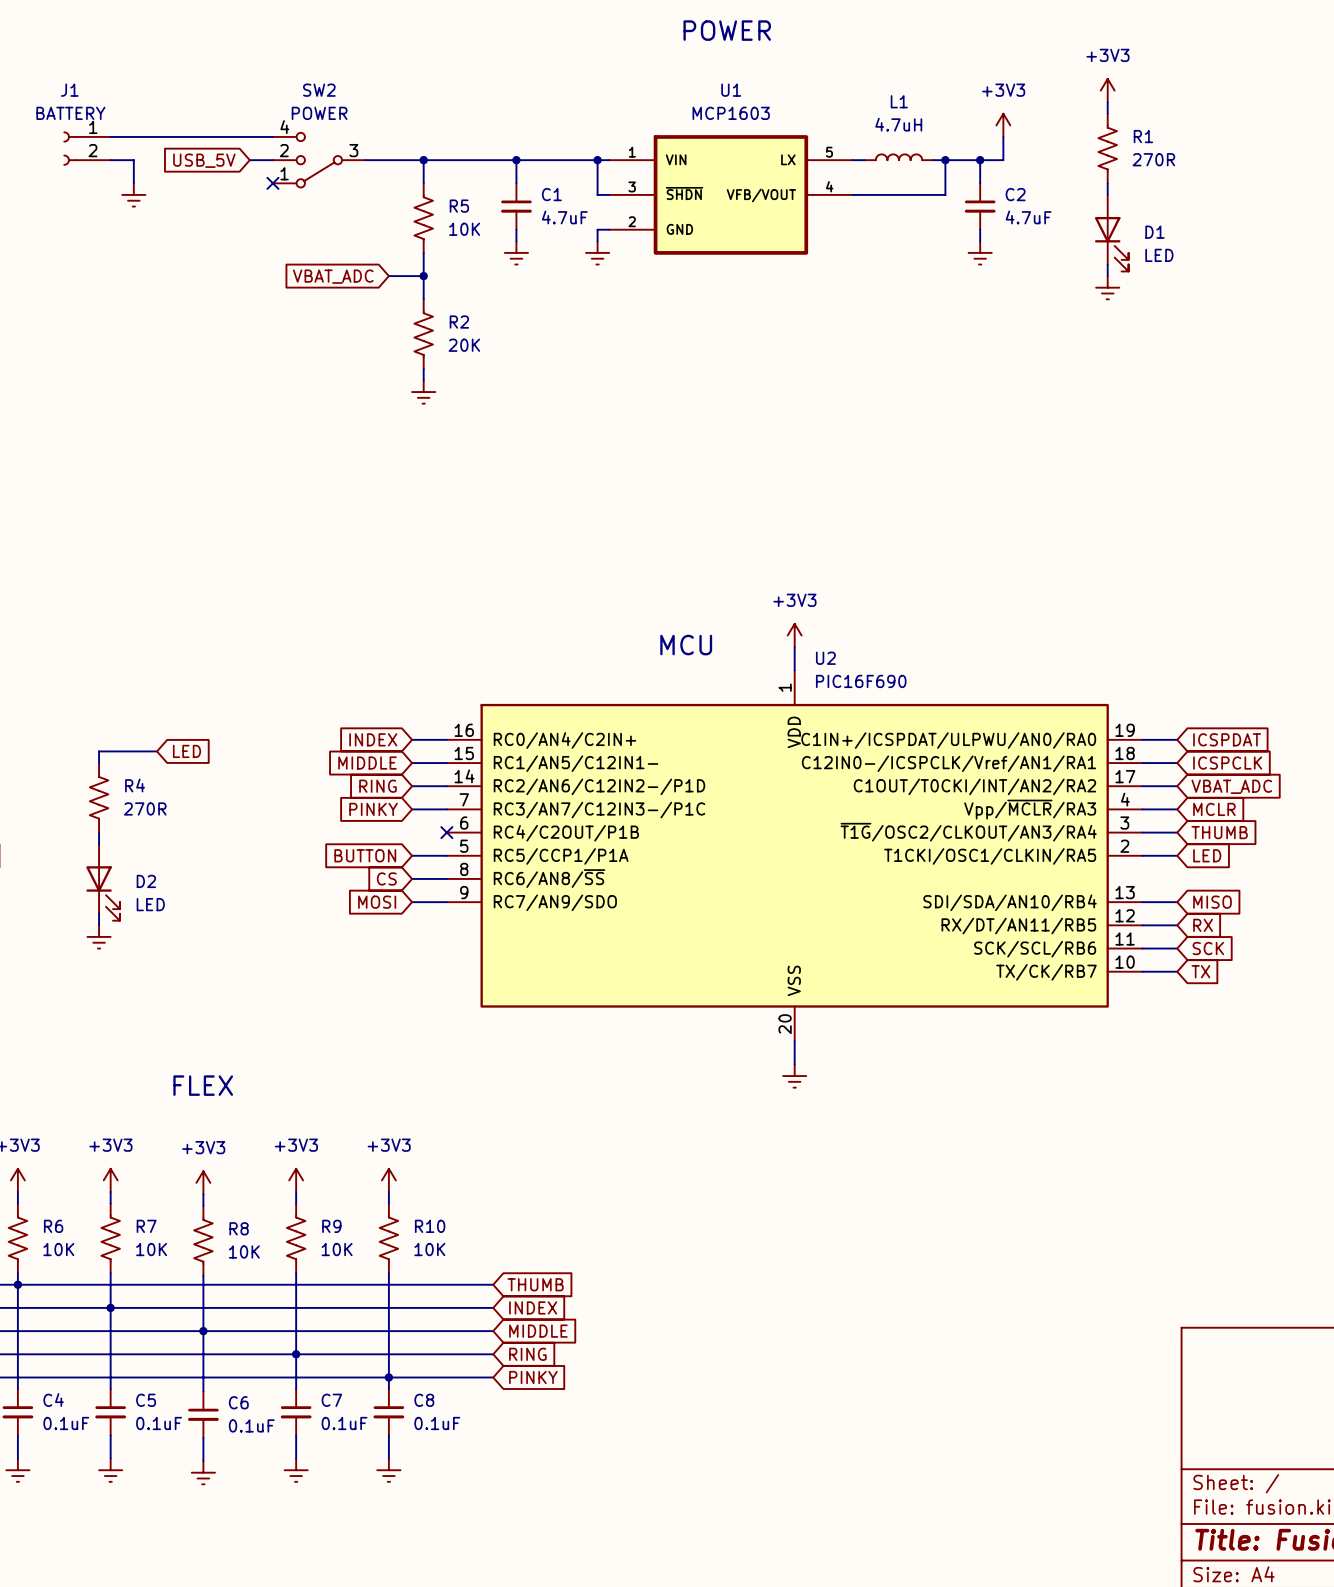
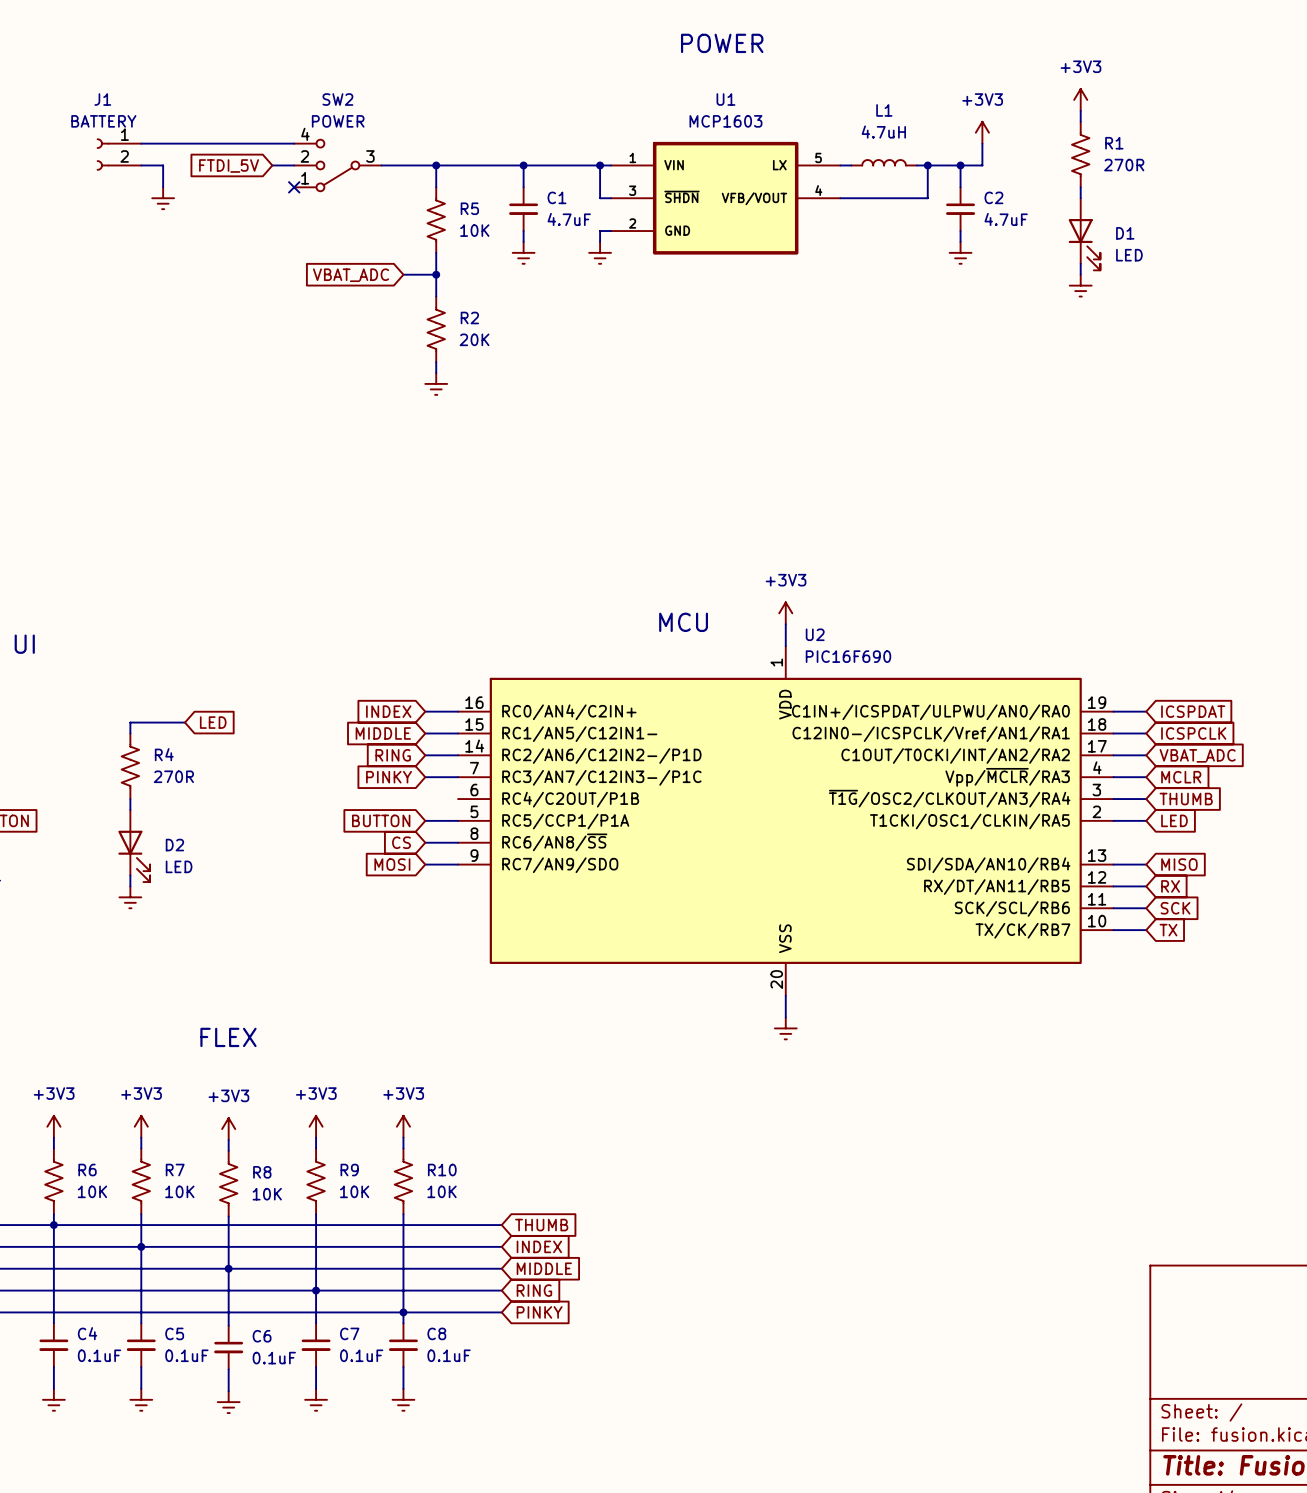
global label: USB_5V (204, 160) -> FTDI_5V (229, 165)
no-connect mark: (446, 832) -> none

